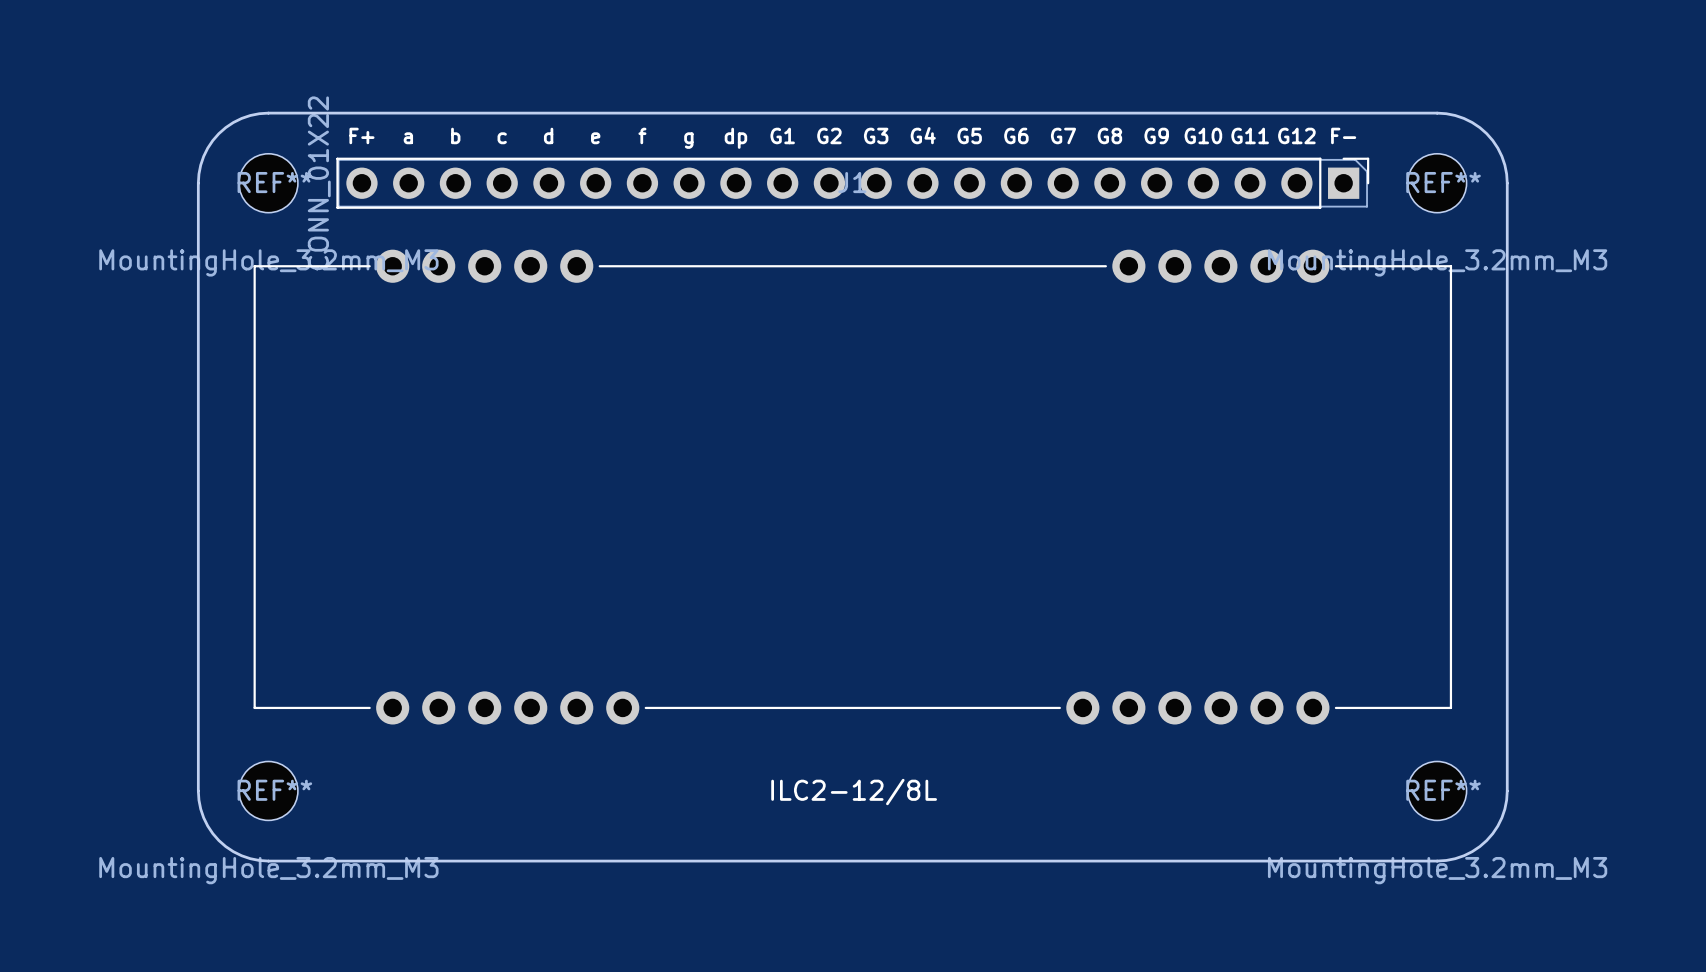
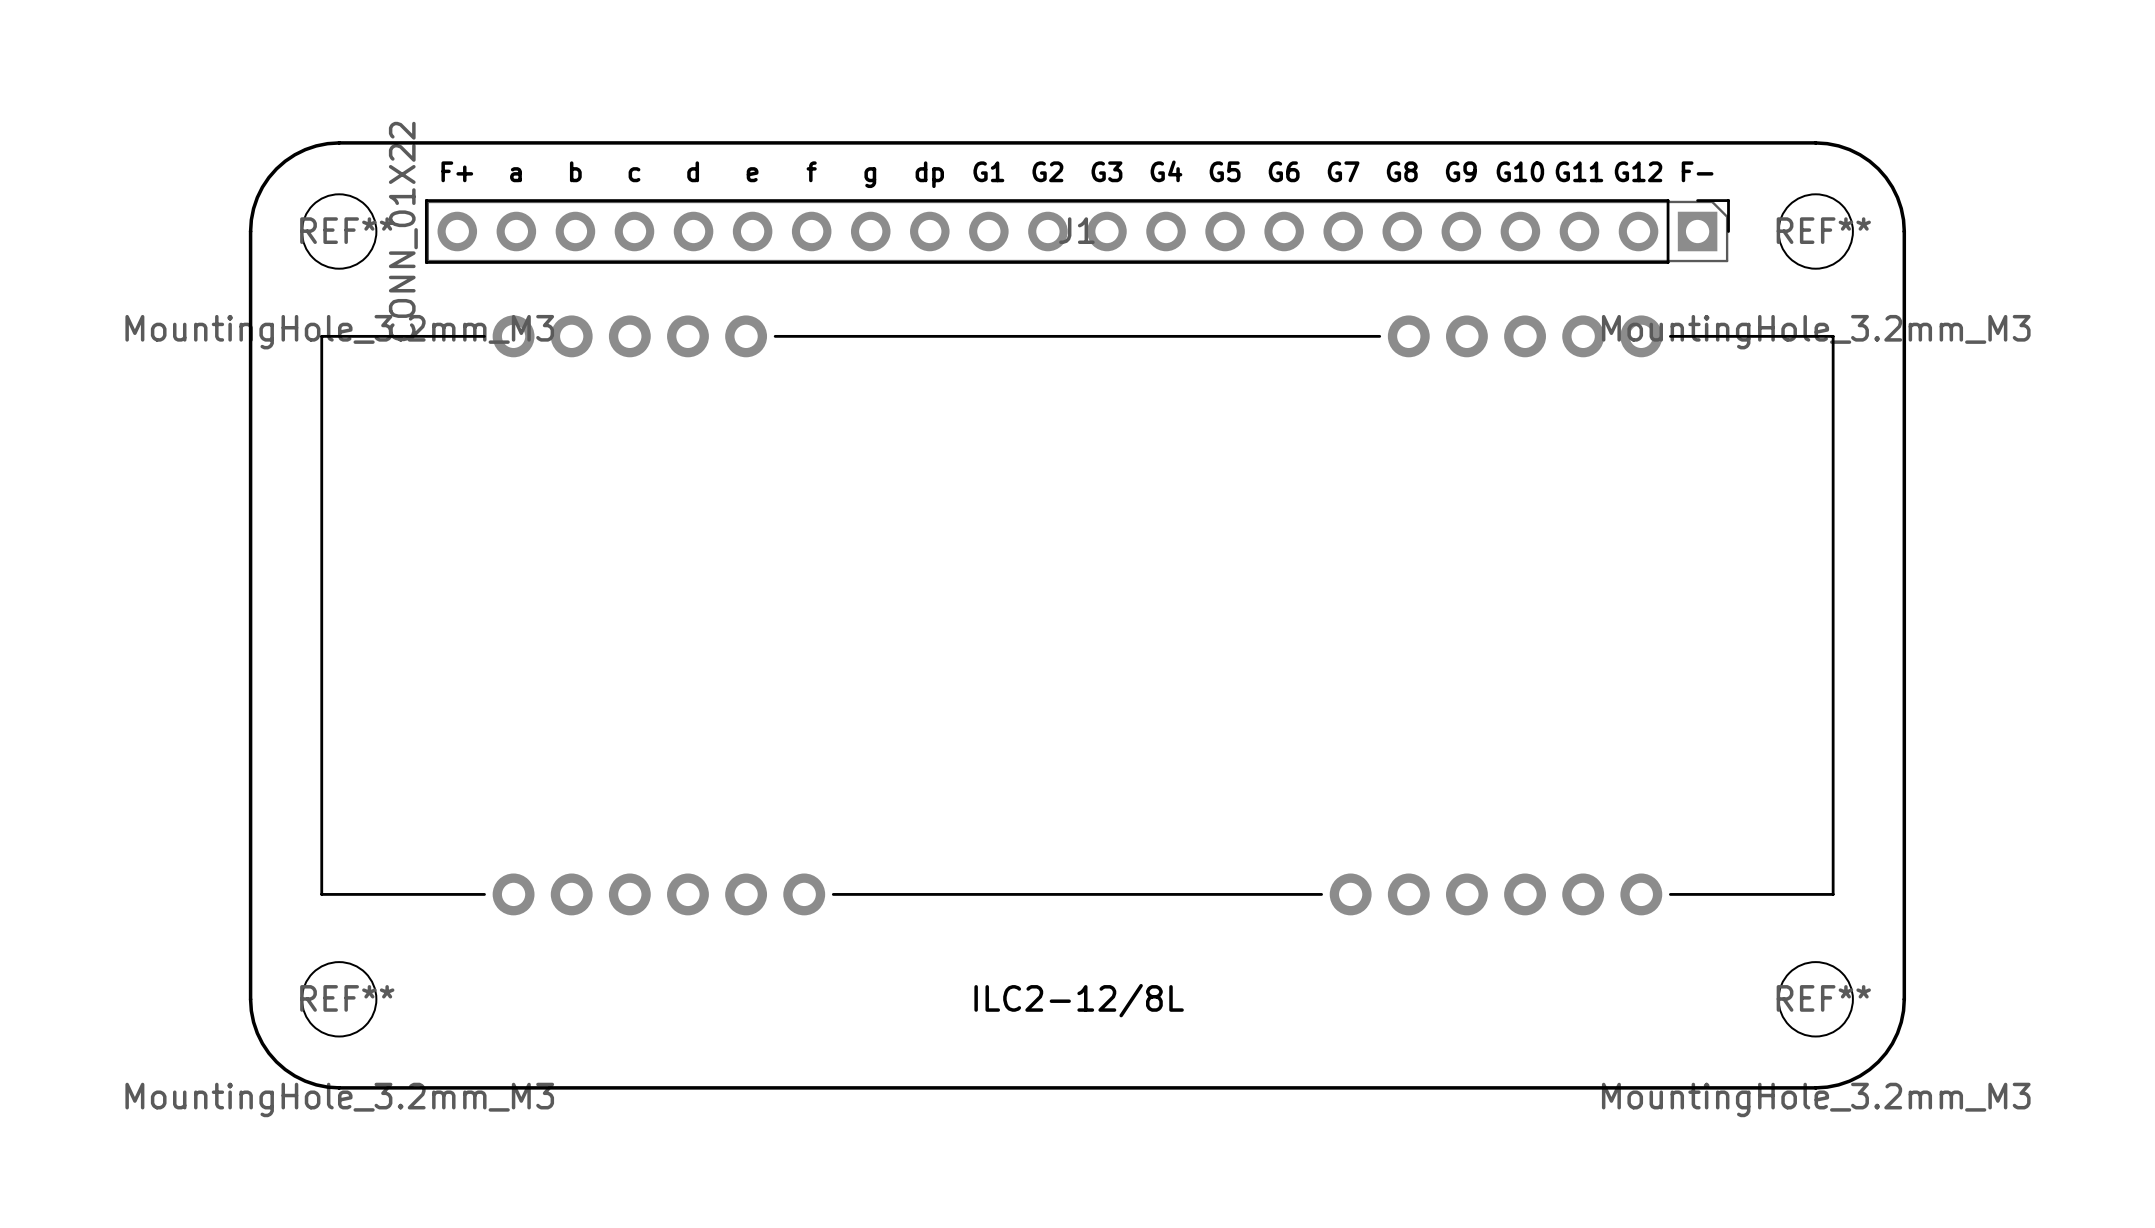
part footprint: [253, 249, 1453, 725] -> [320, 315, 1835, 916]

